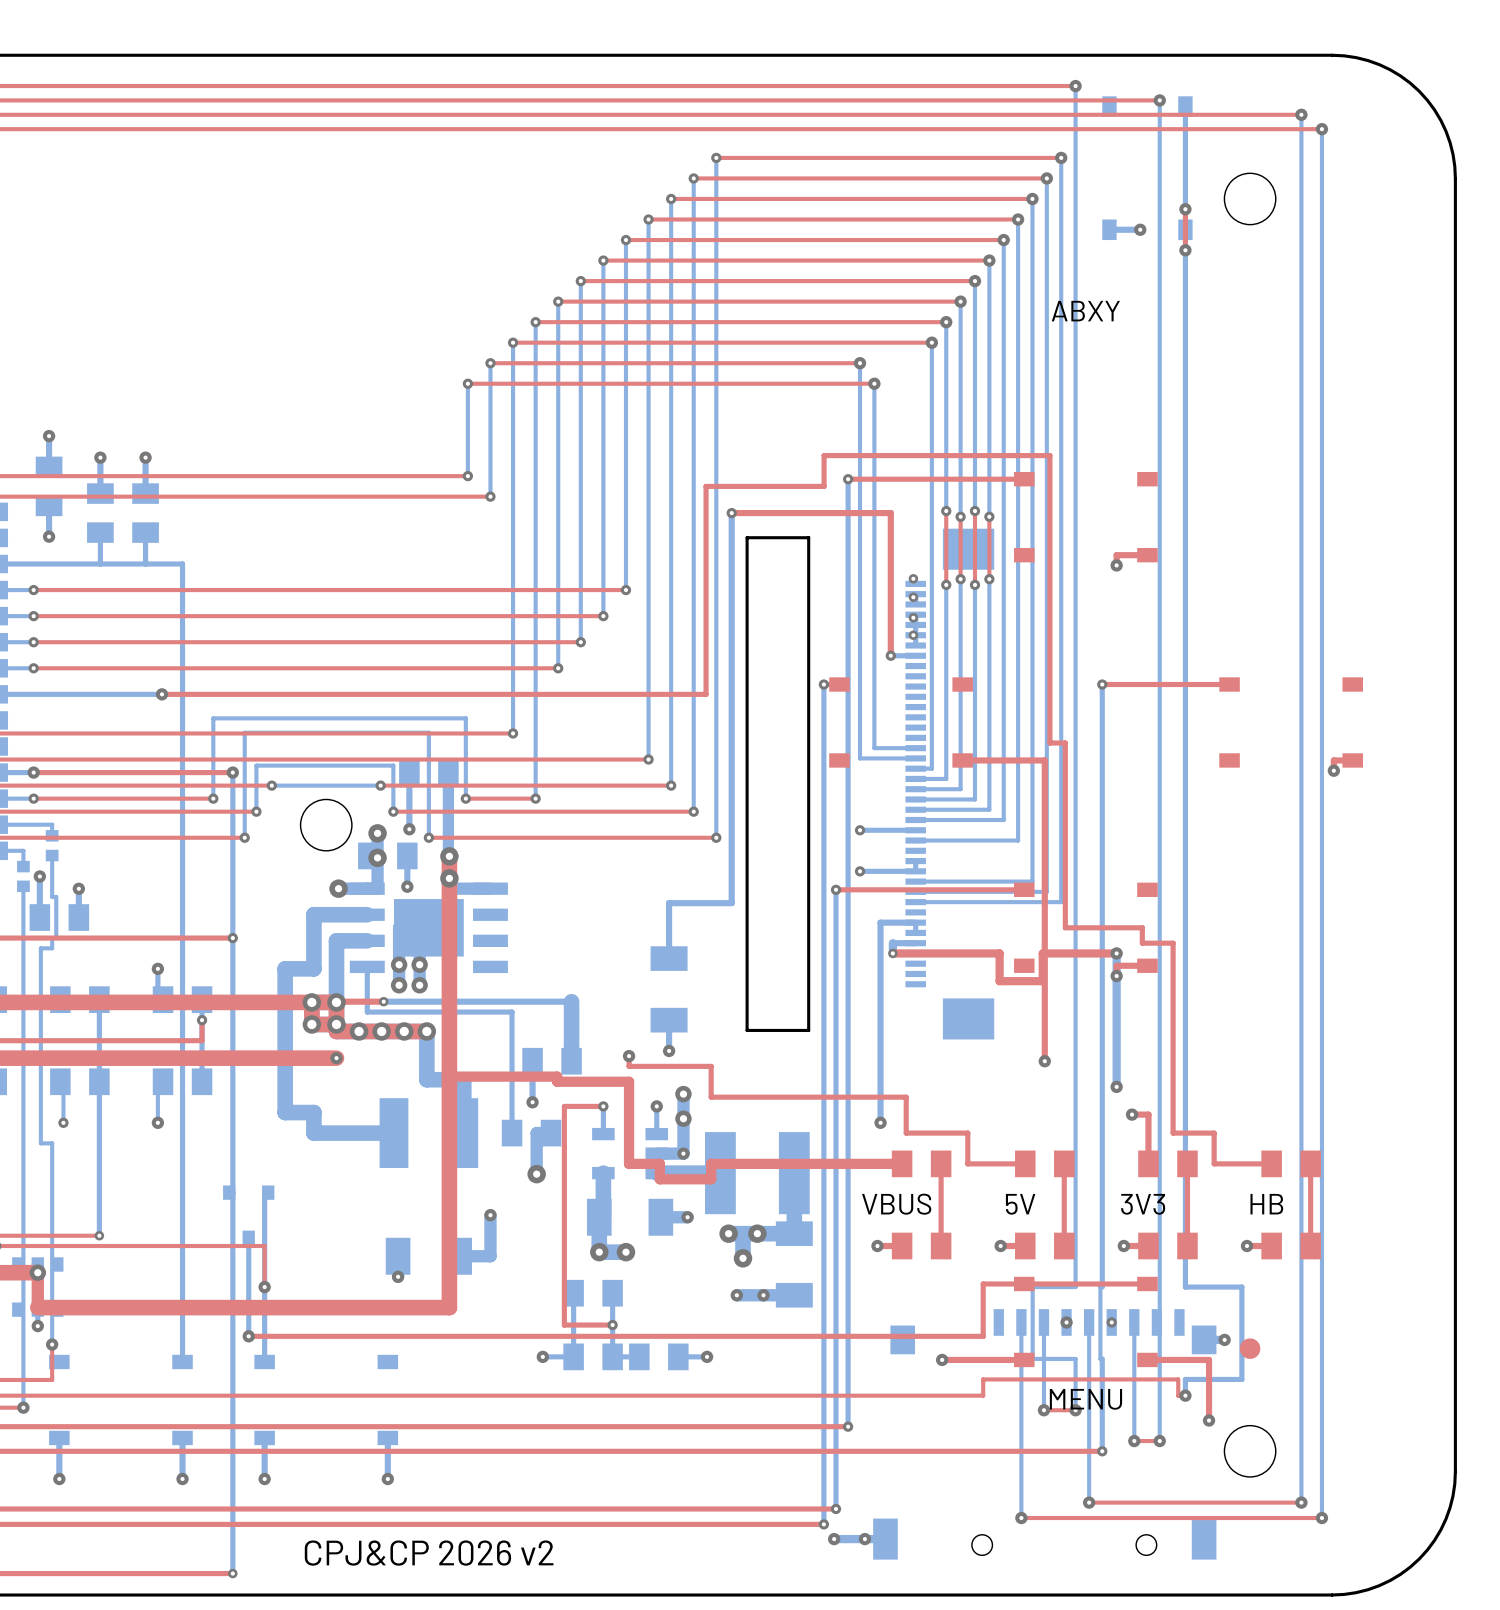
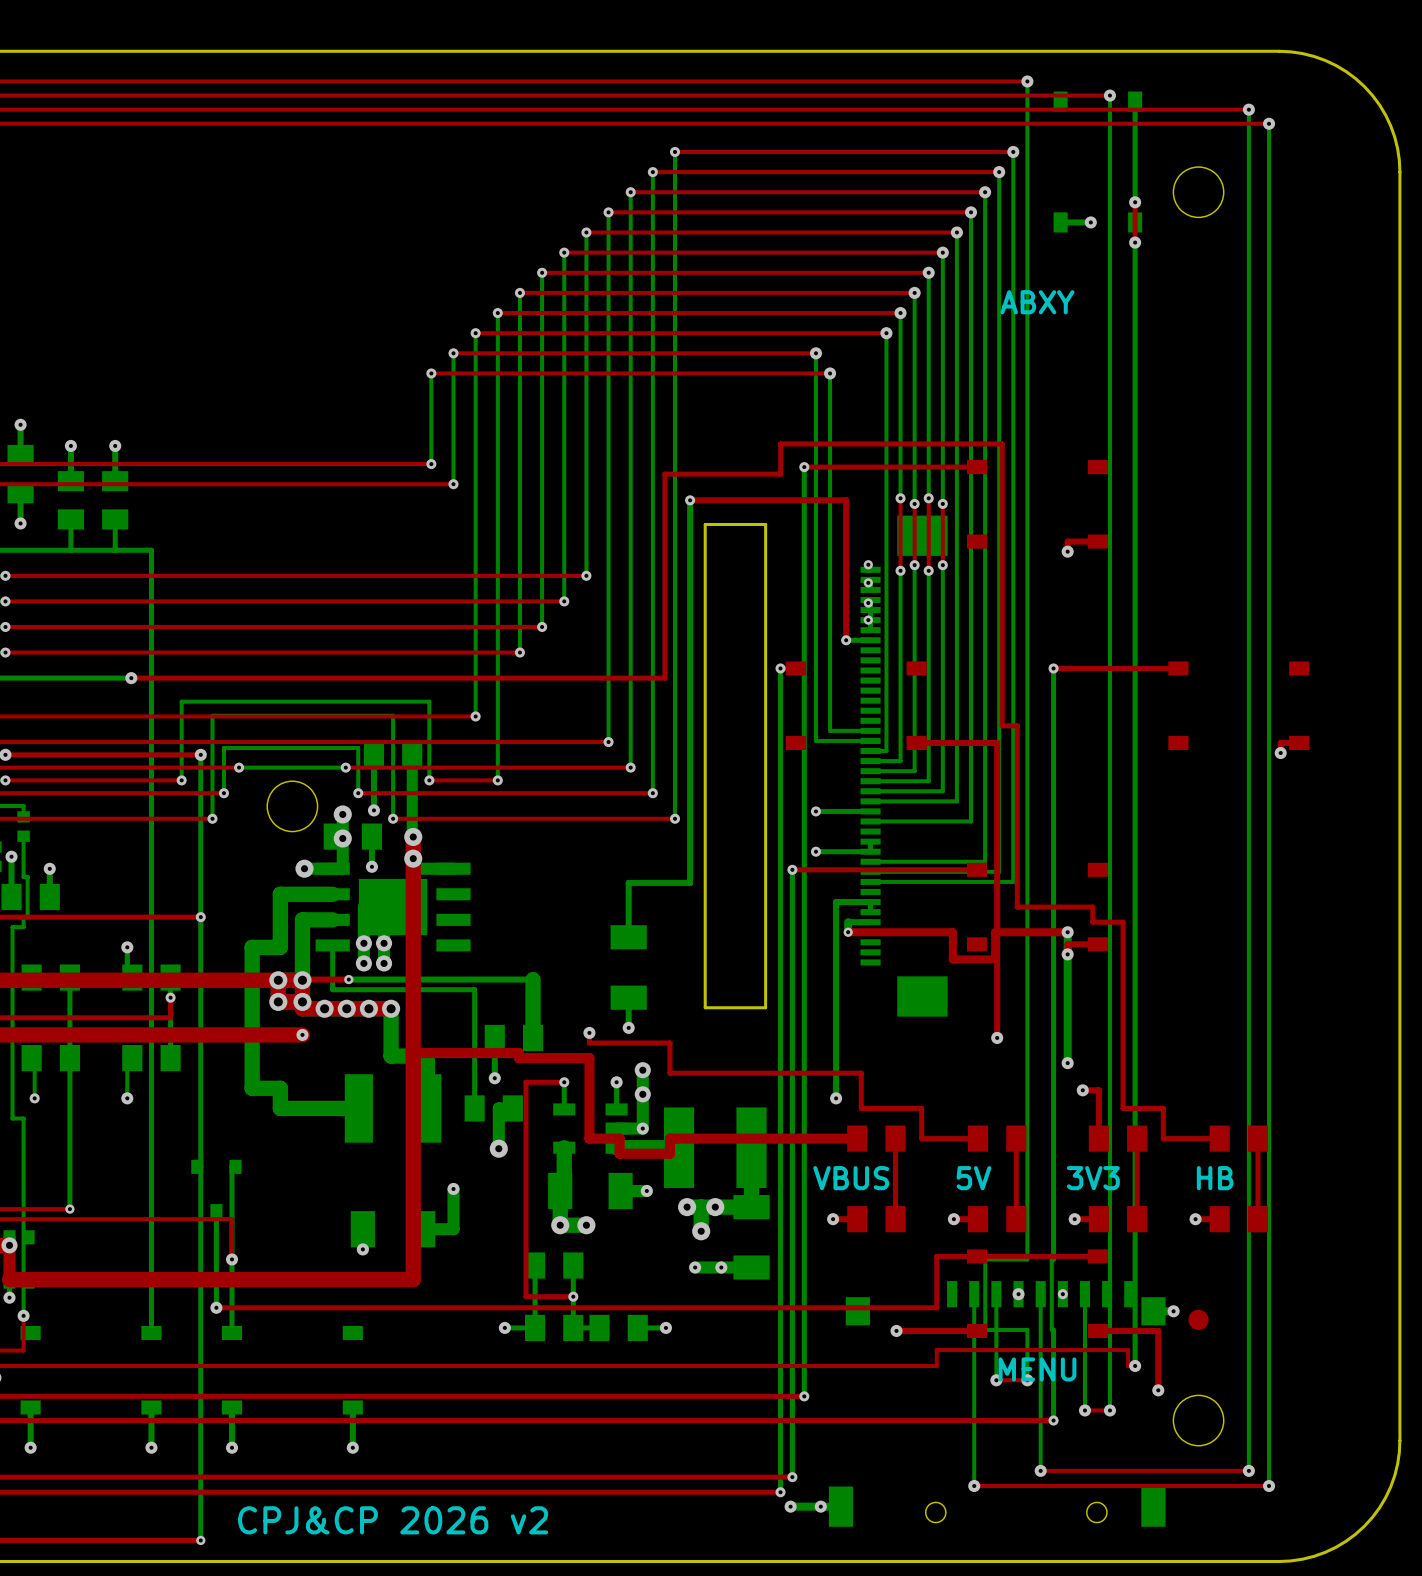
bottom track: (1185, 1287) (1241, 1287) (1241, 1379) (1185, 1379) -> (1135, 1259) (1135, 1350)

